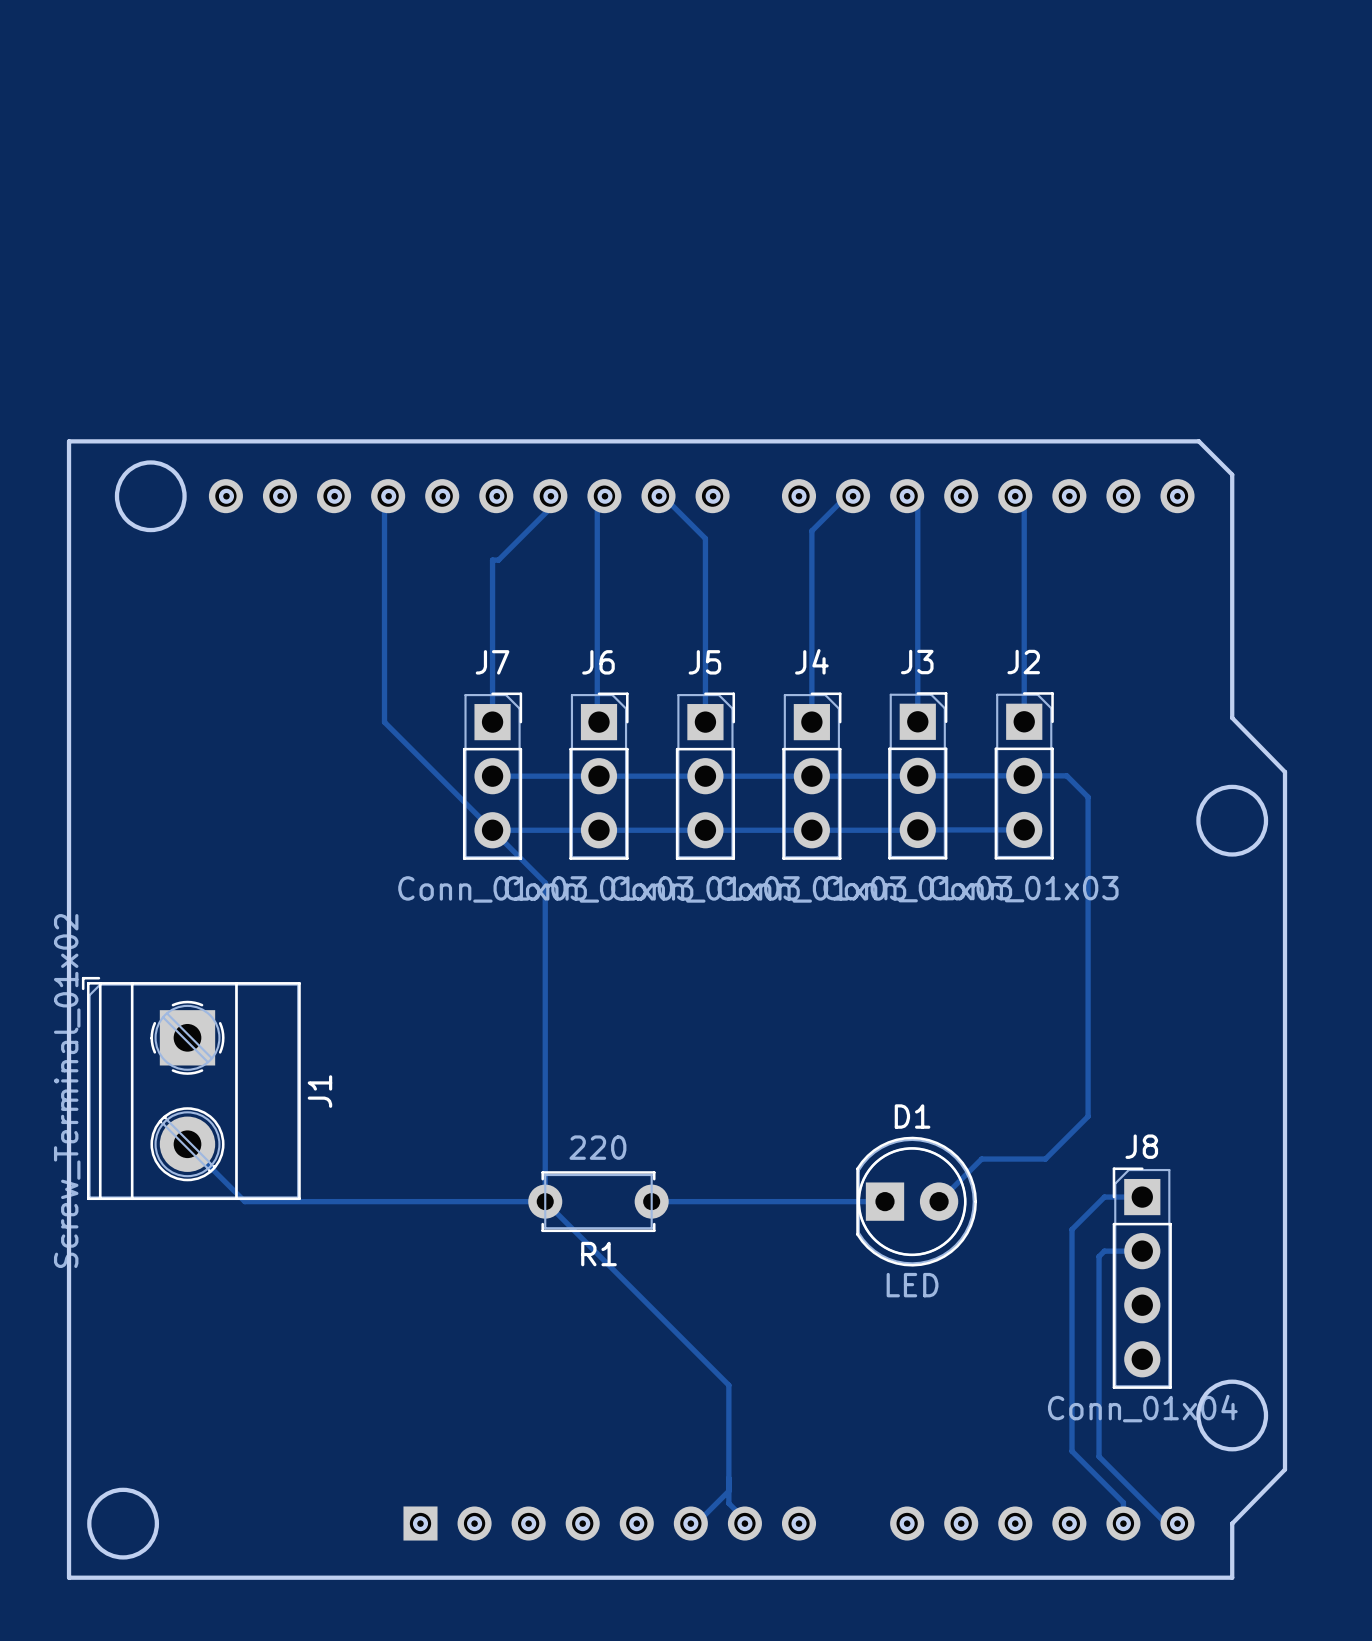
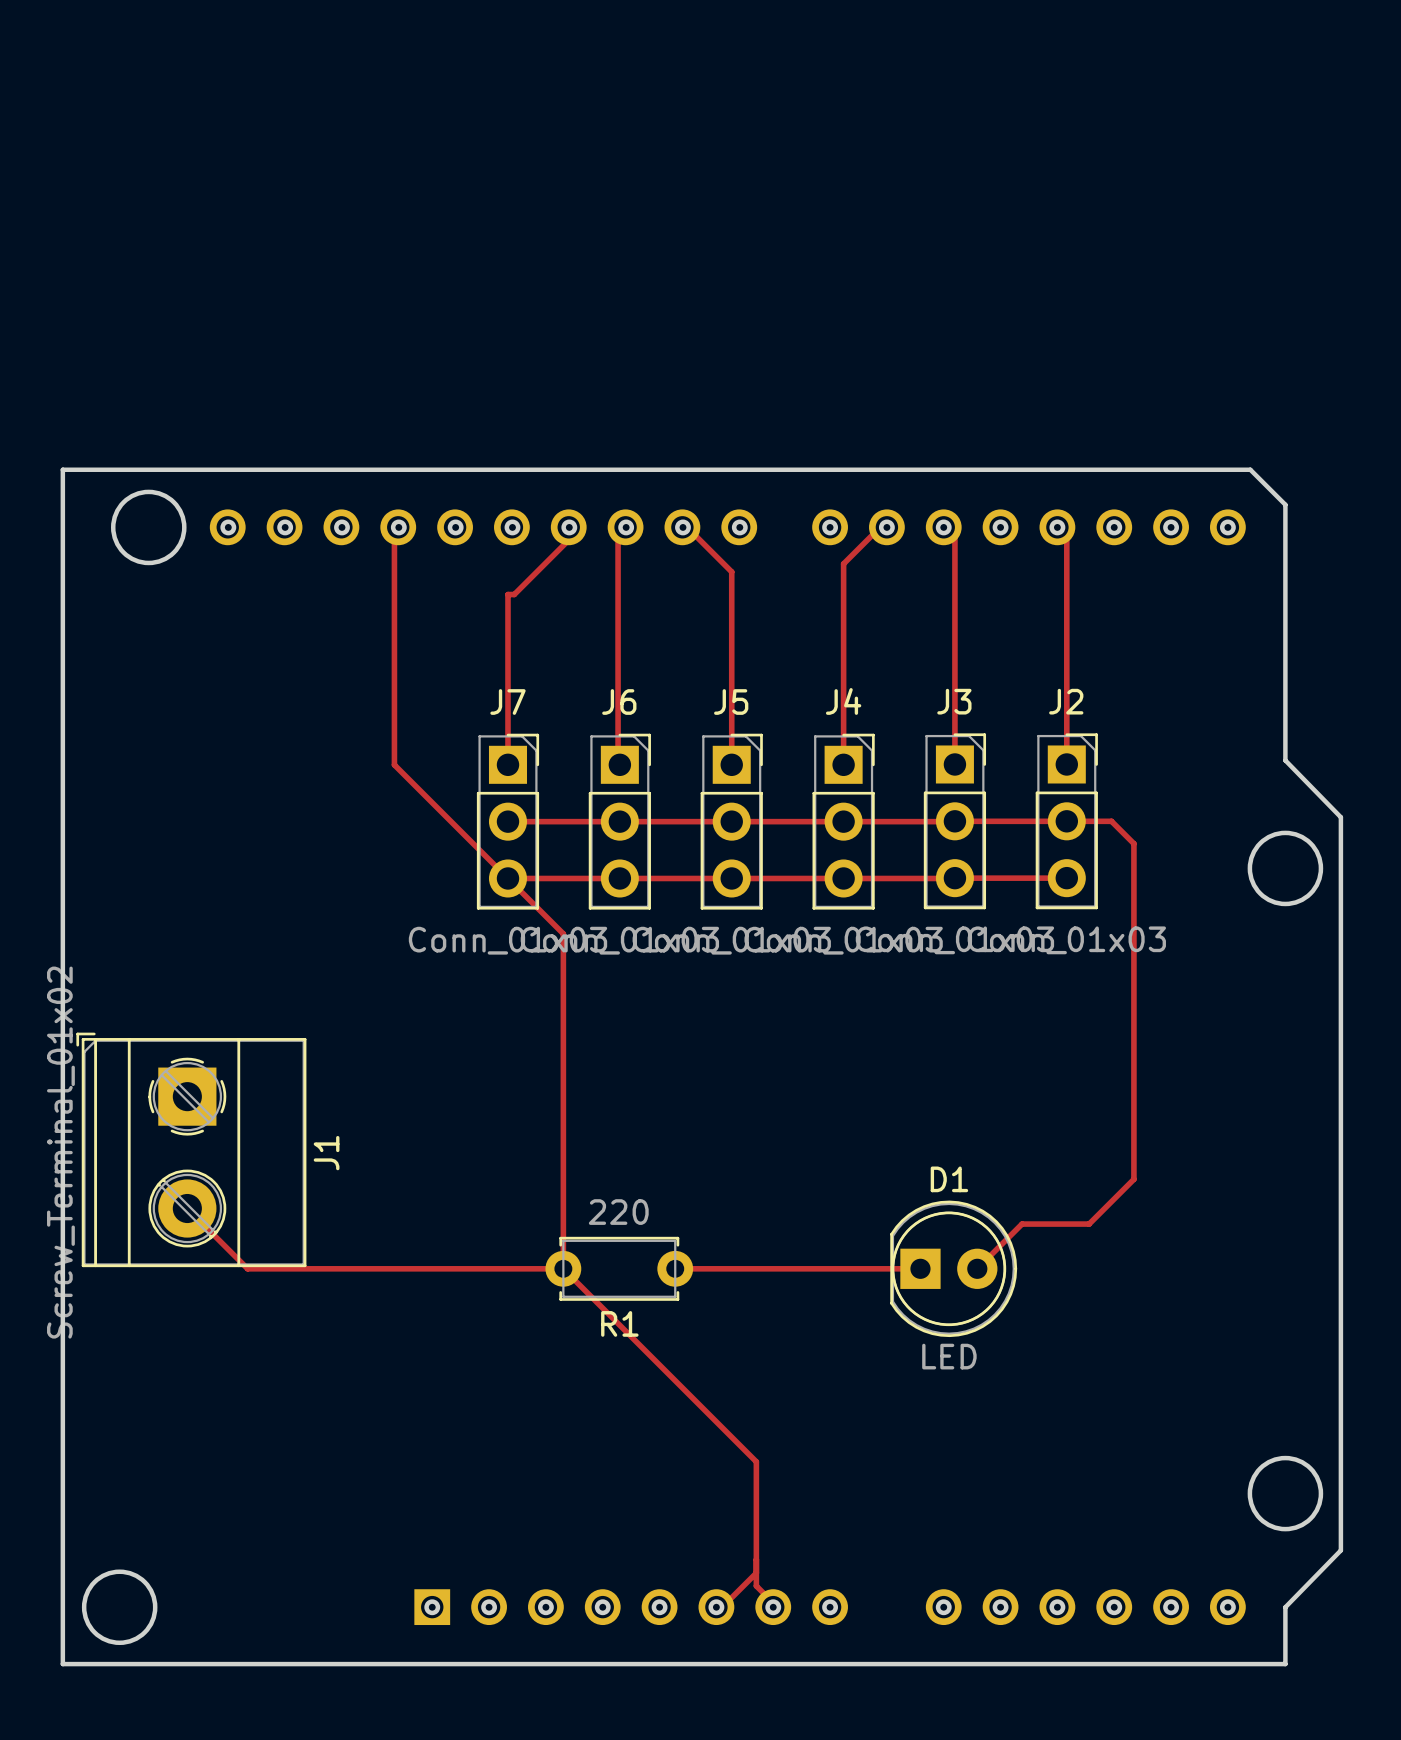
track: (1142, 1197) (1104, 1197) (1072, 1229) (1072, 1451) (1123, 1502) (1123, 1515) -> none
track: (1142, 1251) (1104, 1251) (1099, 1256) (1099, 1456) (1172, 1530) (1180, 1531) (1185, 1526) (1185, 1522) -> none
J8: Conn_01x04 (1142, 1278) -> none

